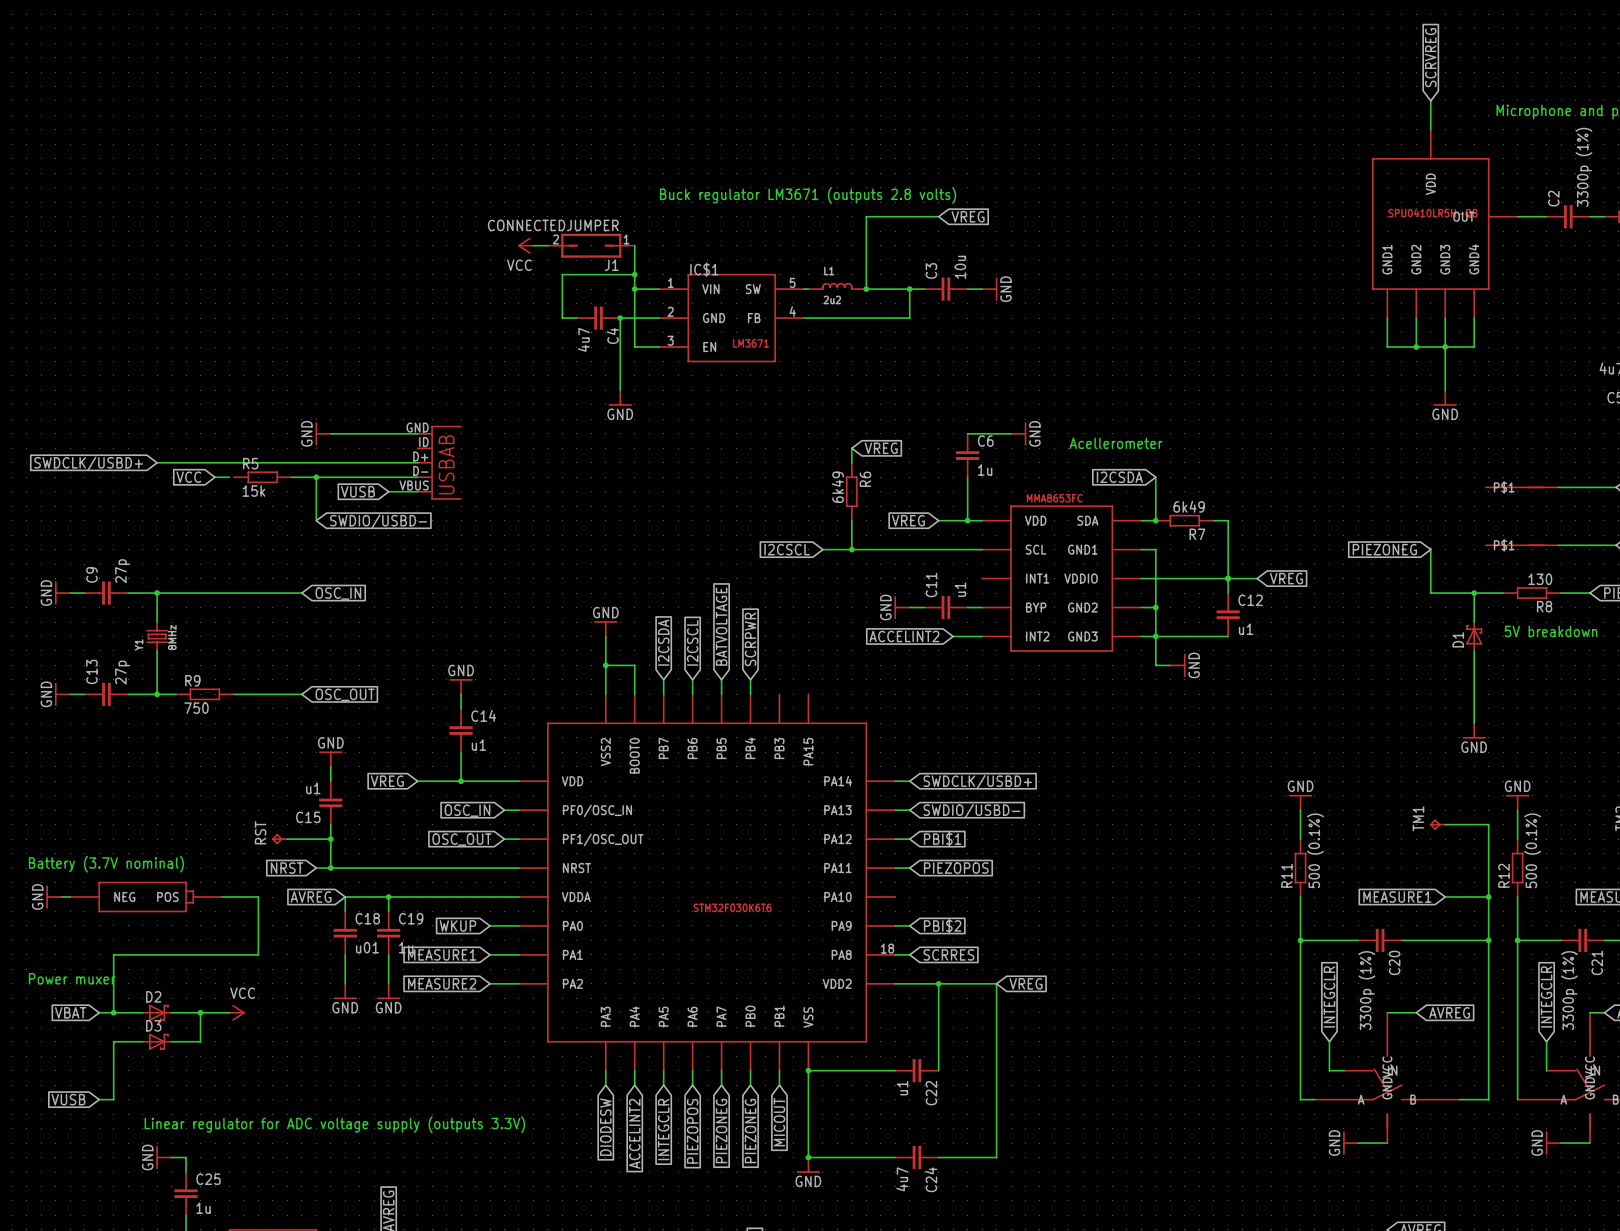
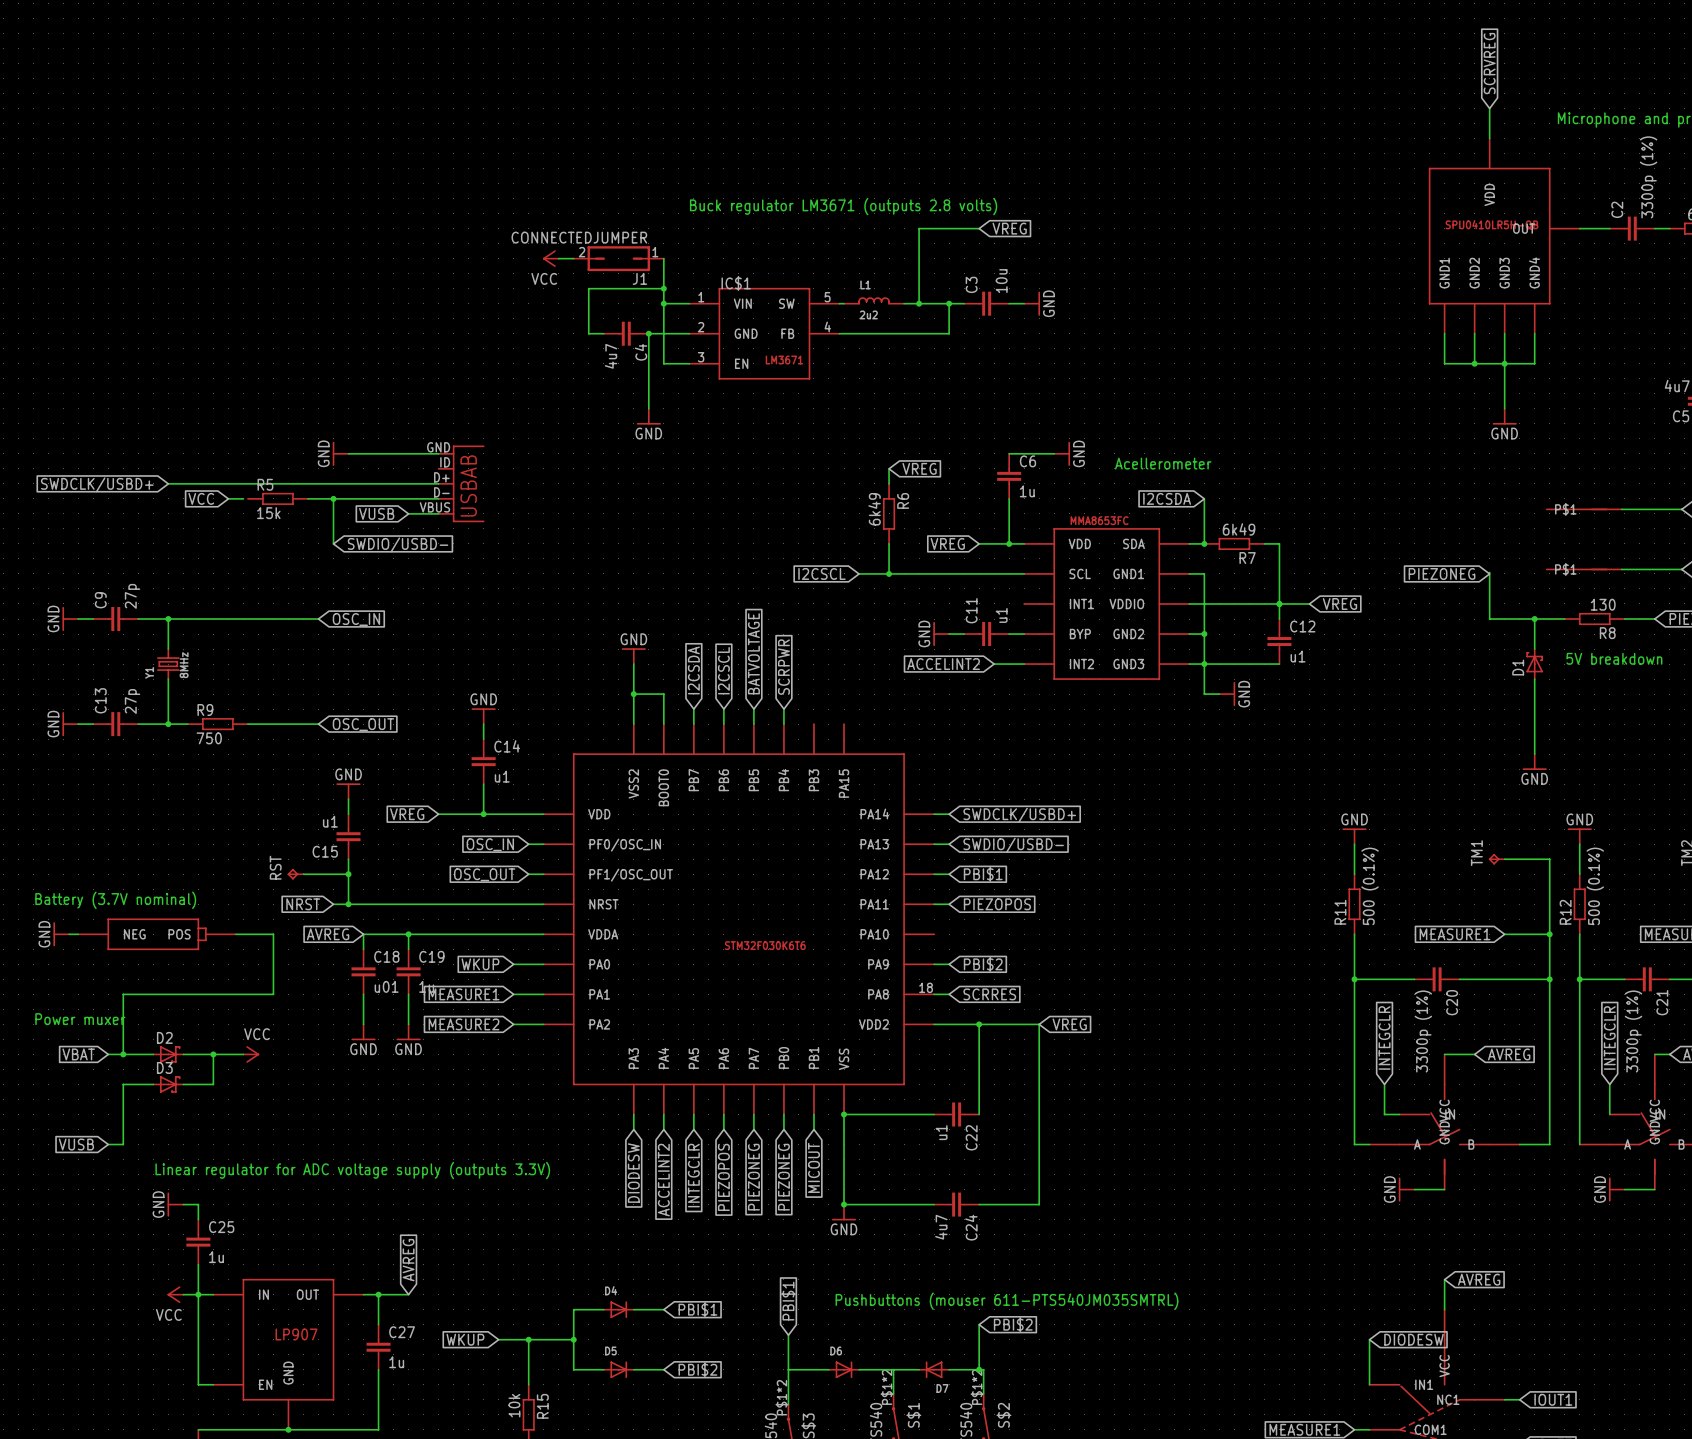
wire: (880, 216) (866, 216) (866, 289) -> (919, 228) (919, 303)
junction position: (866, 289) -> (919, 303)

